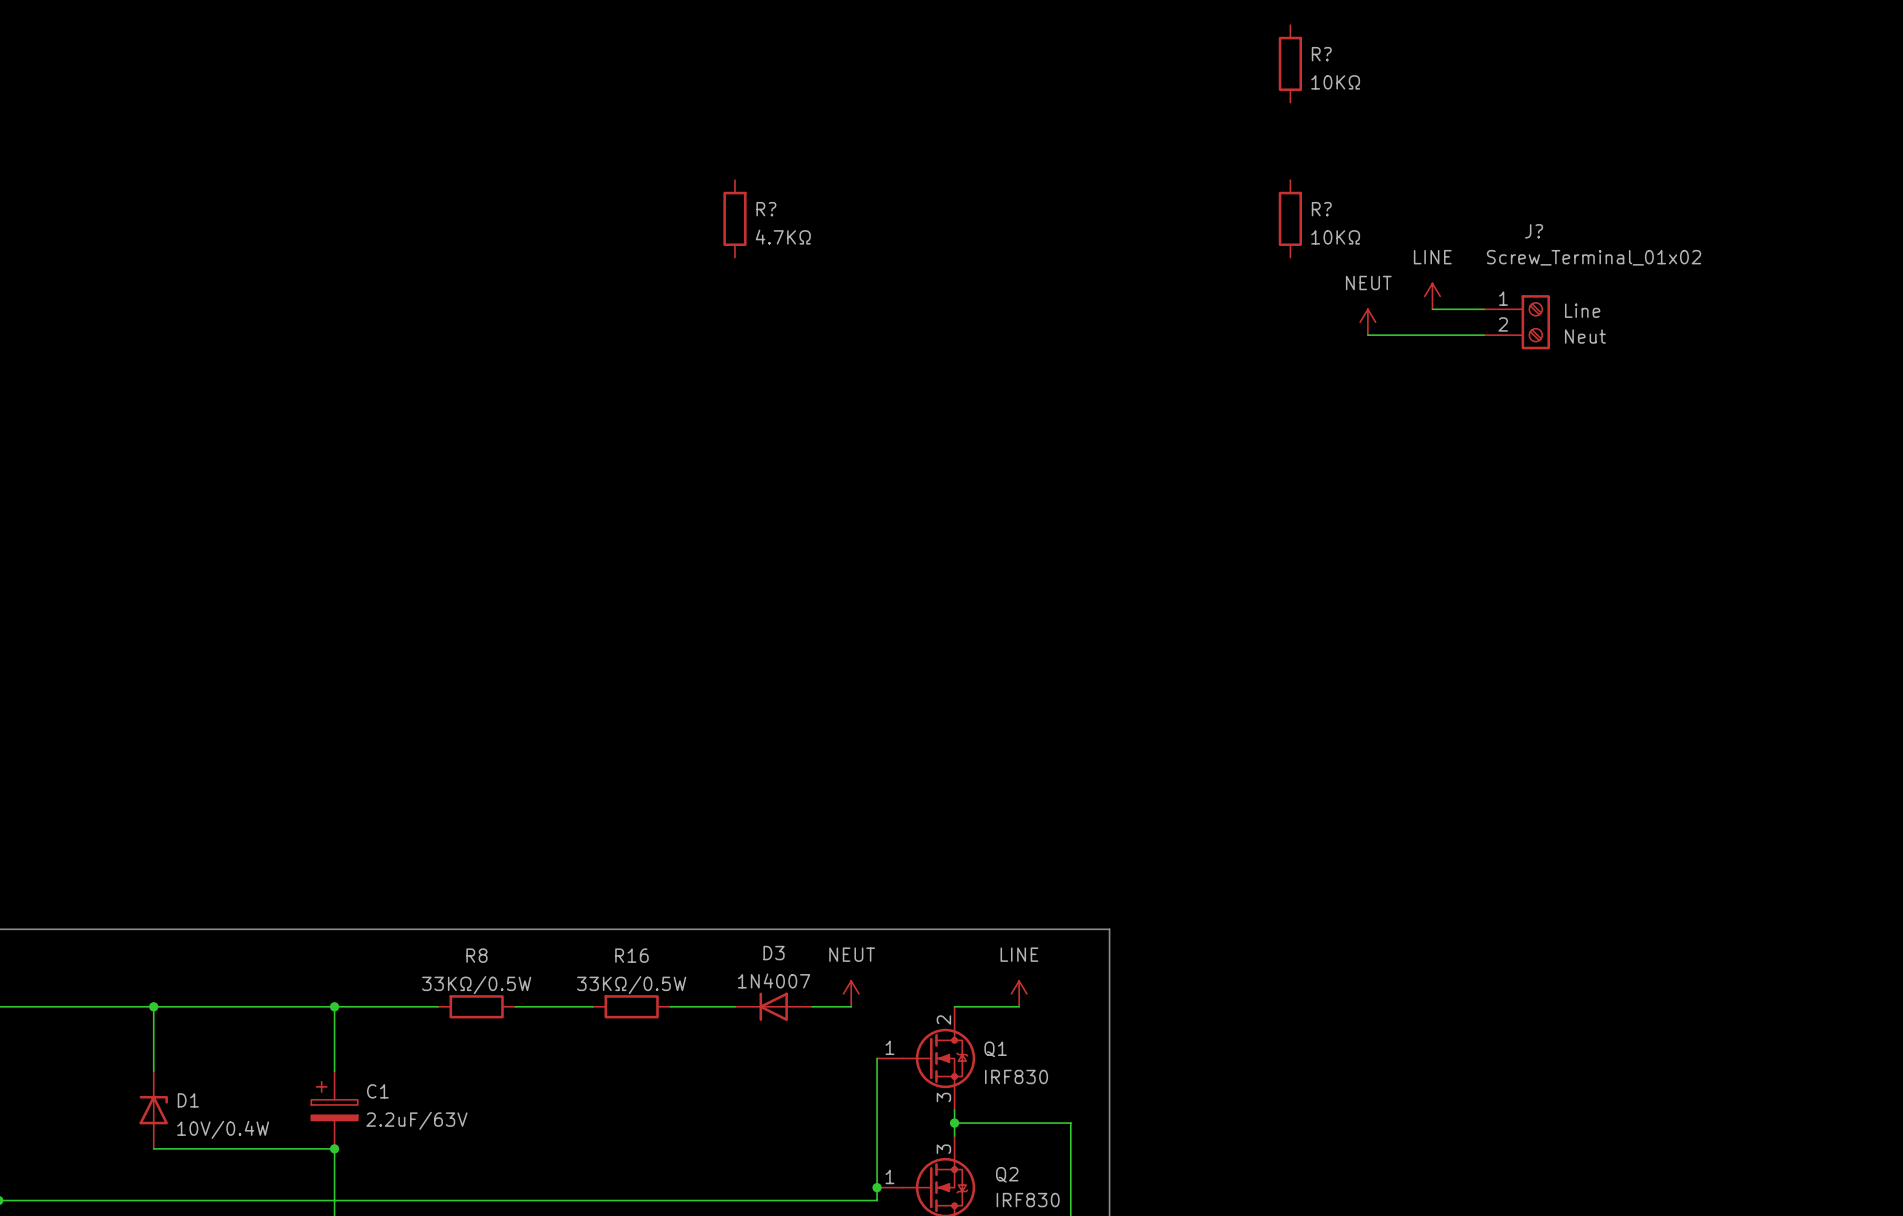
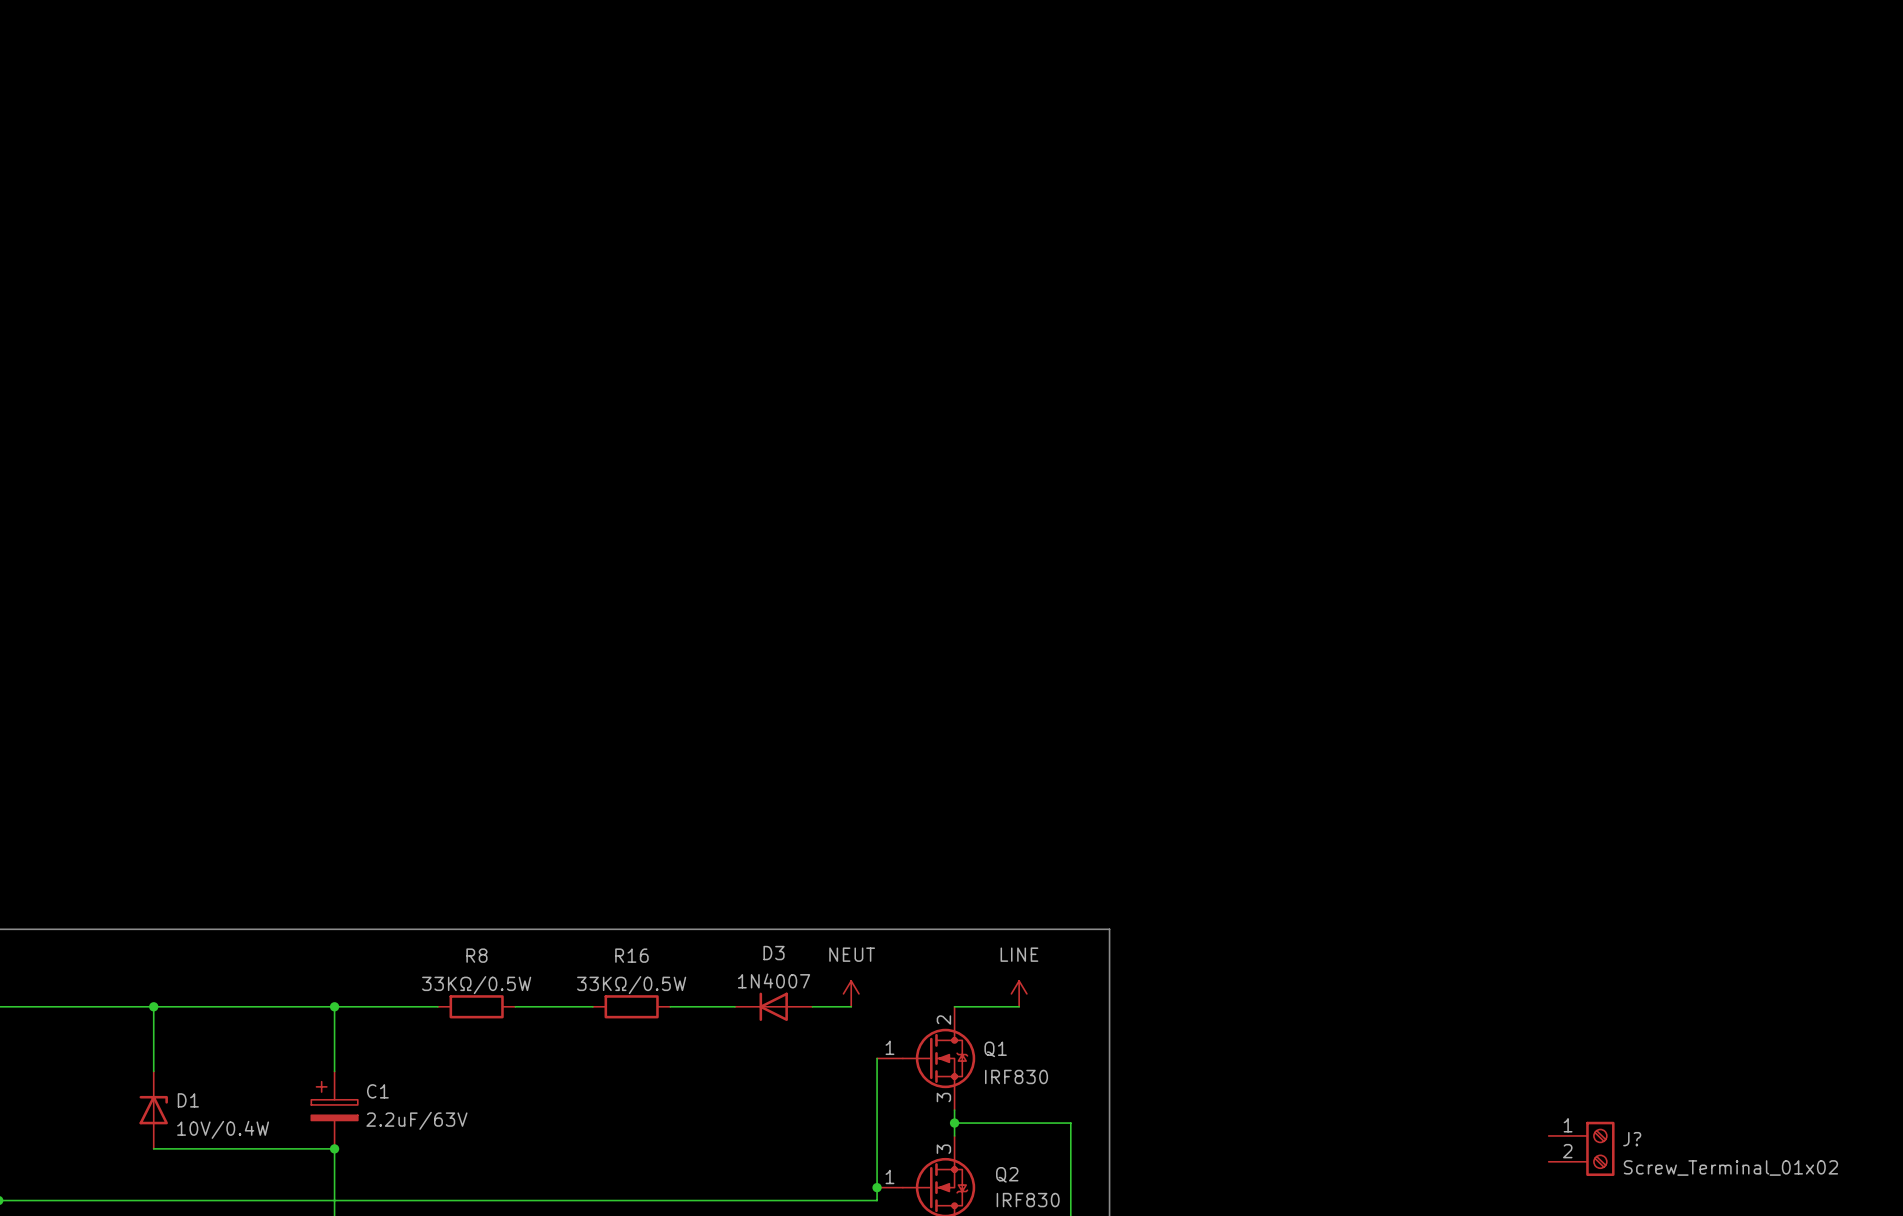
R?: 10KΩ (1290, 63) -> none
R?: 4.7KΩ (734, 218) -> none
R?: 10KΩ (1290, 218) -> none
power symbol: LINE (1432, 296) -> none
wire: (1432, 309) (1484, 309) -> none
label: Line (1582, 310) -> none
power symbol: NEUT (1367, 322) -> none
J?: Screw_Terminal_01x02 (1517, 322) -> none
wire: (1367, 335) (1484, 335) -> none
label: Neut (1585, 336) -> none
J?: none -> Screw_Terminal_01x02 (1581, 1148)

